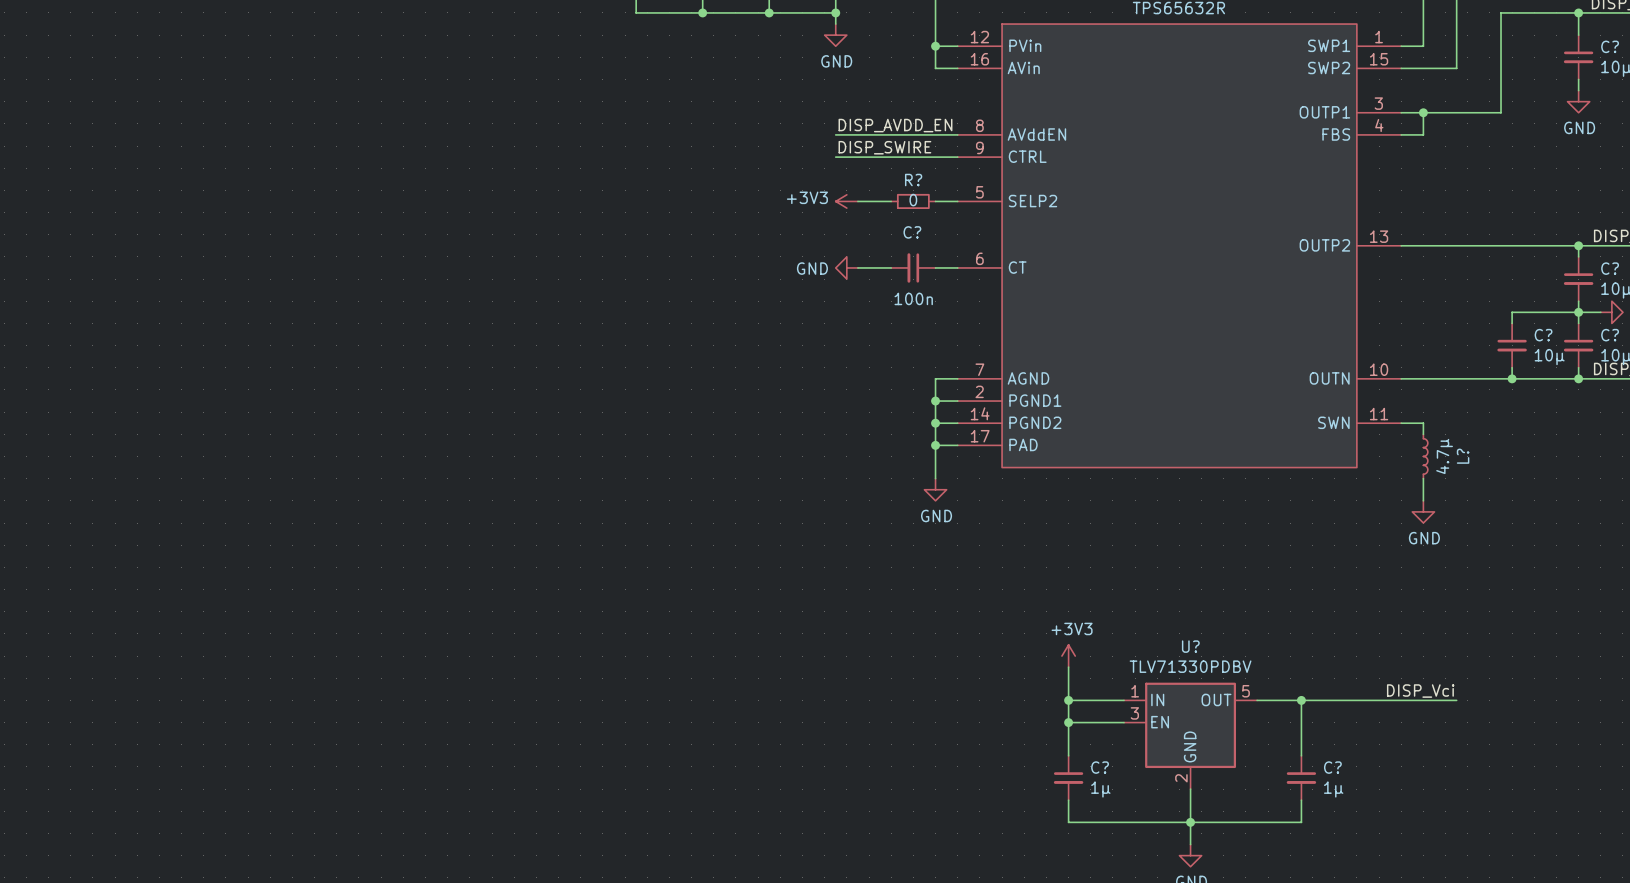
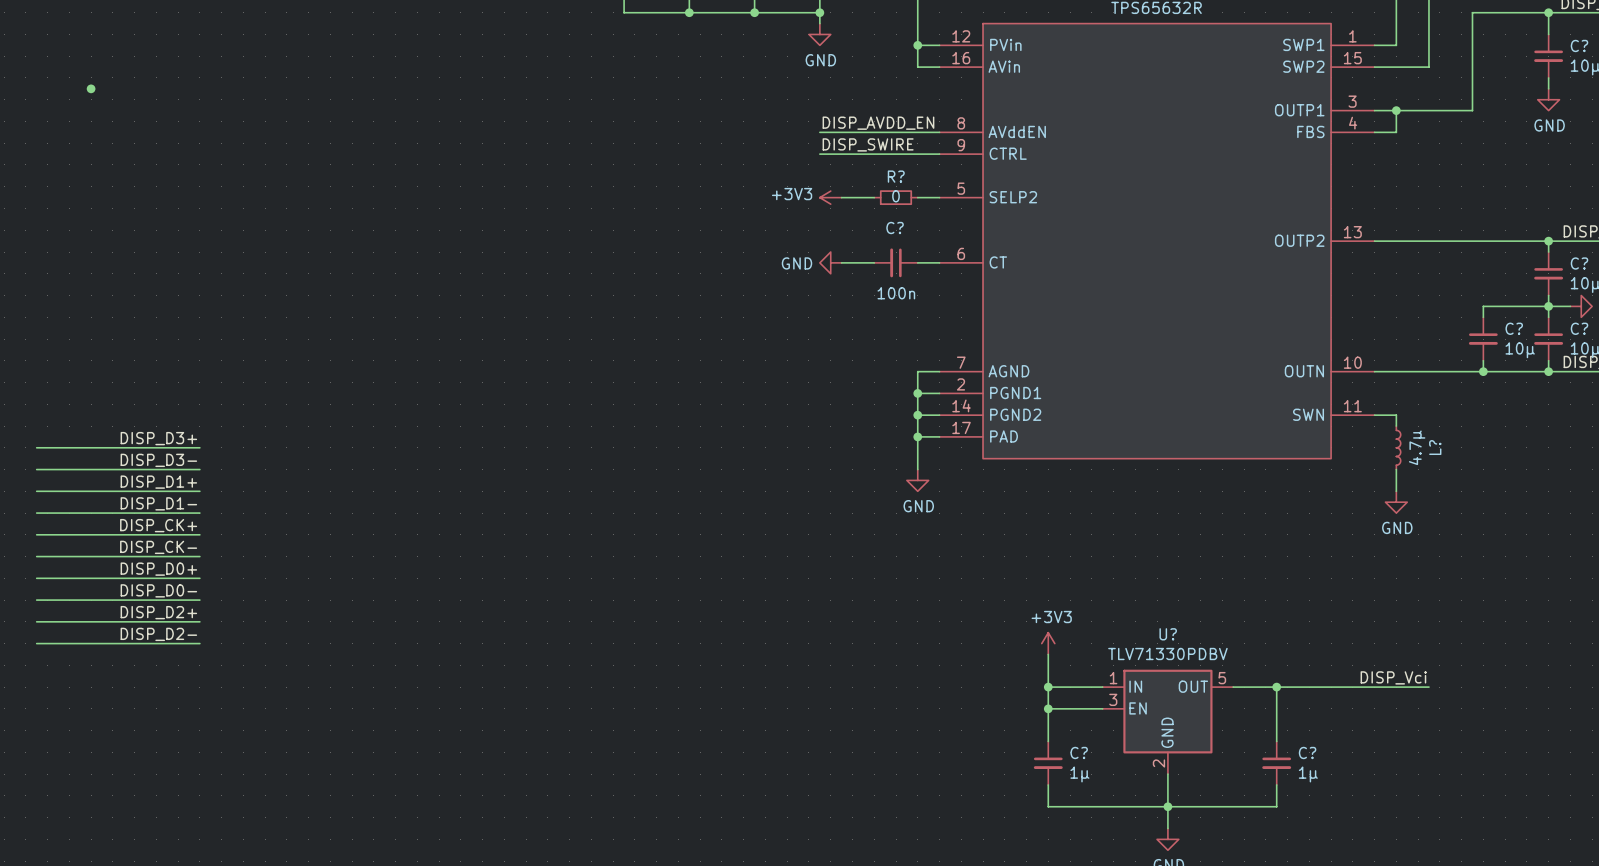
junction: none -> (91, 88)
label: none -> DISP_D3+ (158, 438)
wire: none -> (36, 447) (199, 447)
label: none -> DISP_D3- (158, 460)
wire: none -> (36, 469) (199, 469)
label: none -> DISP_D1+ (158, 482)
wire: none -> (36, 491) (199, 491)
label: none -> DISP_D1- (158, 503)
wire: none -> (36, 513) (199, 513)
label: none -> DISP_CK+ (158, 525)
wire: none -> (36, 534) (199, 534)
label: none -> DISP_CK- (158, 547)
wire: none -> (36, 556) (199, 556)
label: none -> DISP_D0+ (158, 569)
wire: none -> (36, 578) (199, 578)
label: none -> DISP_D0- (158, 590)
wire: none -> (36, 600) (199, 600)
label: none -> DISP_D2+ (158, 612)
wire: none -> (36, 621) (199, 621)
label: none -> DISP_D2- (158, 634)
wire: none -> (36, 643) (199, 643)

